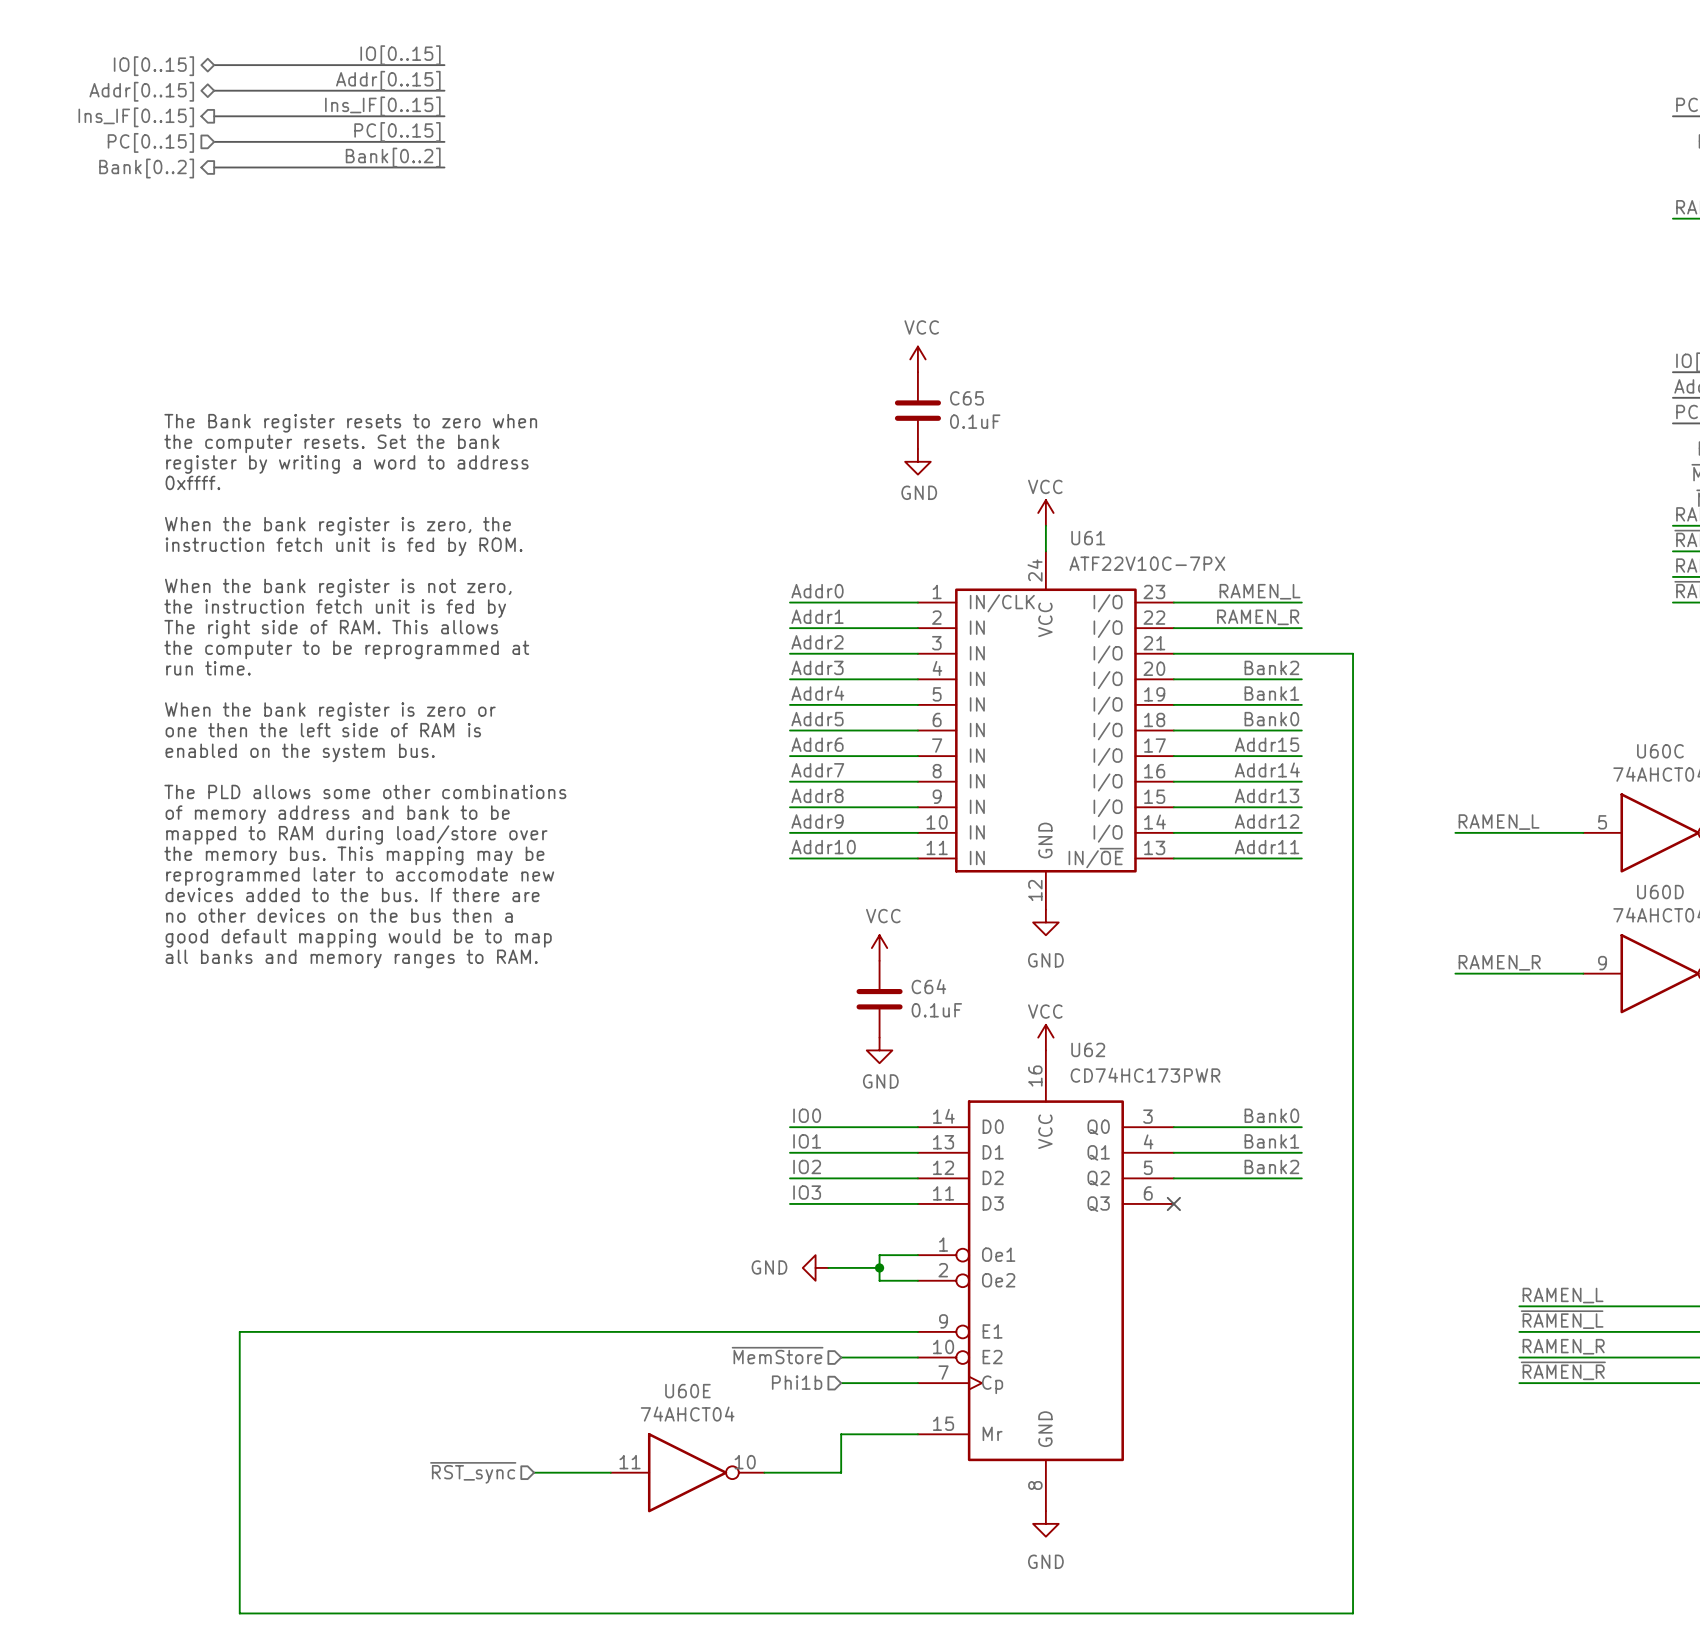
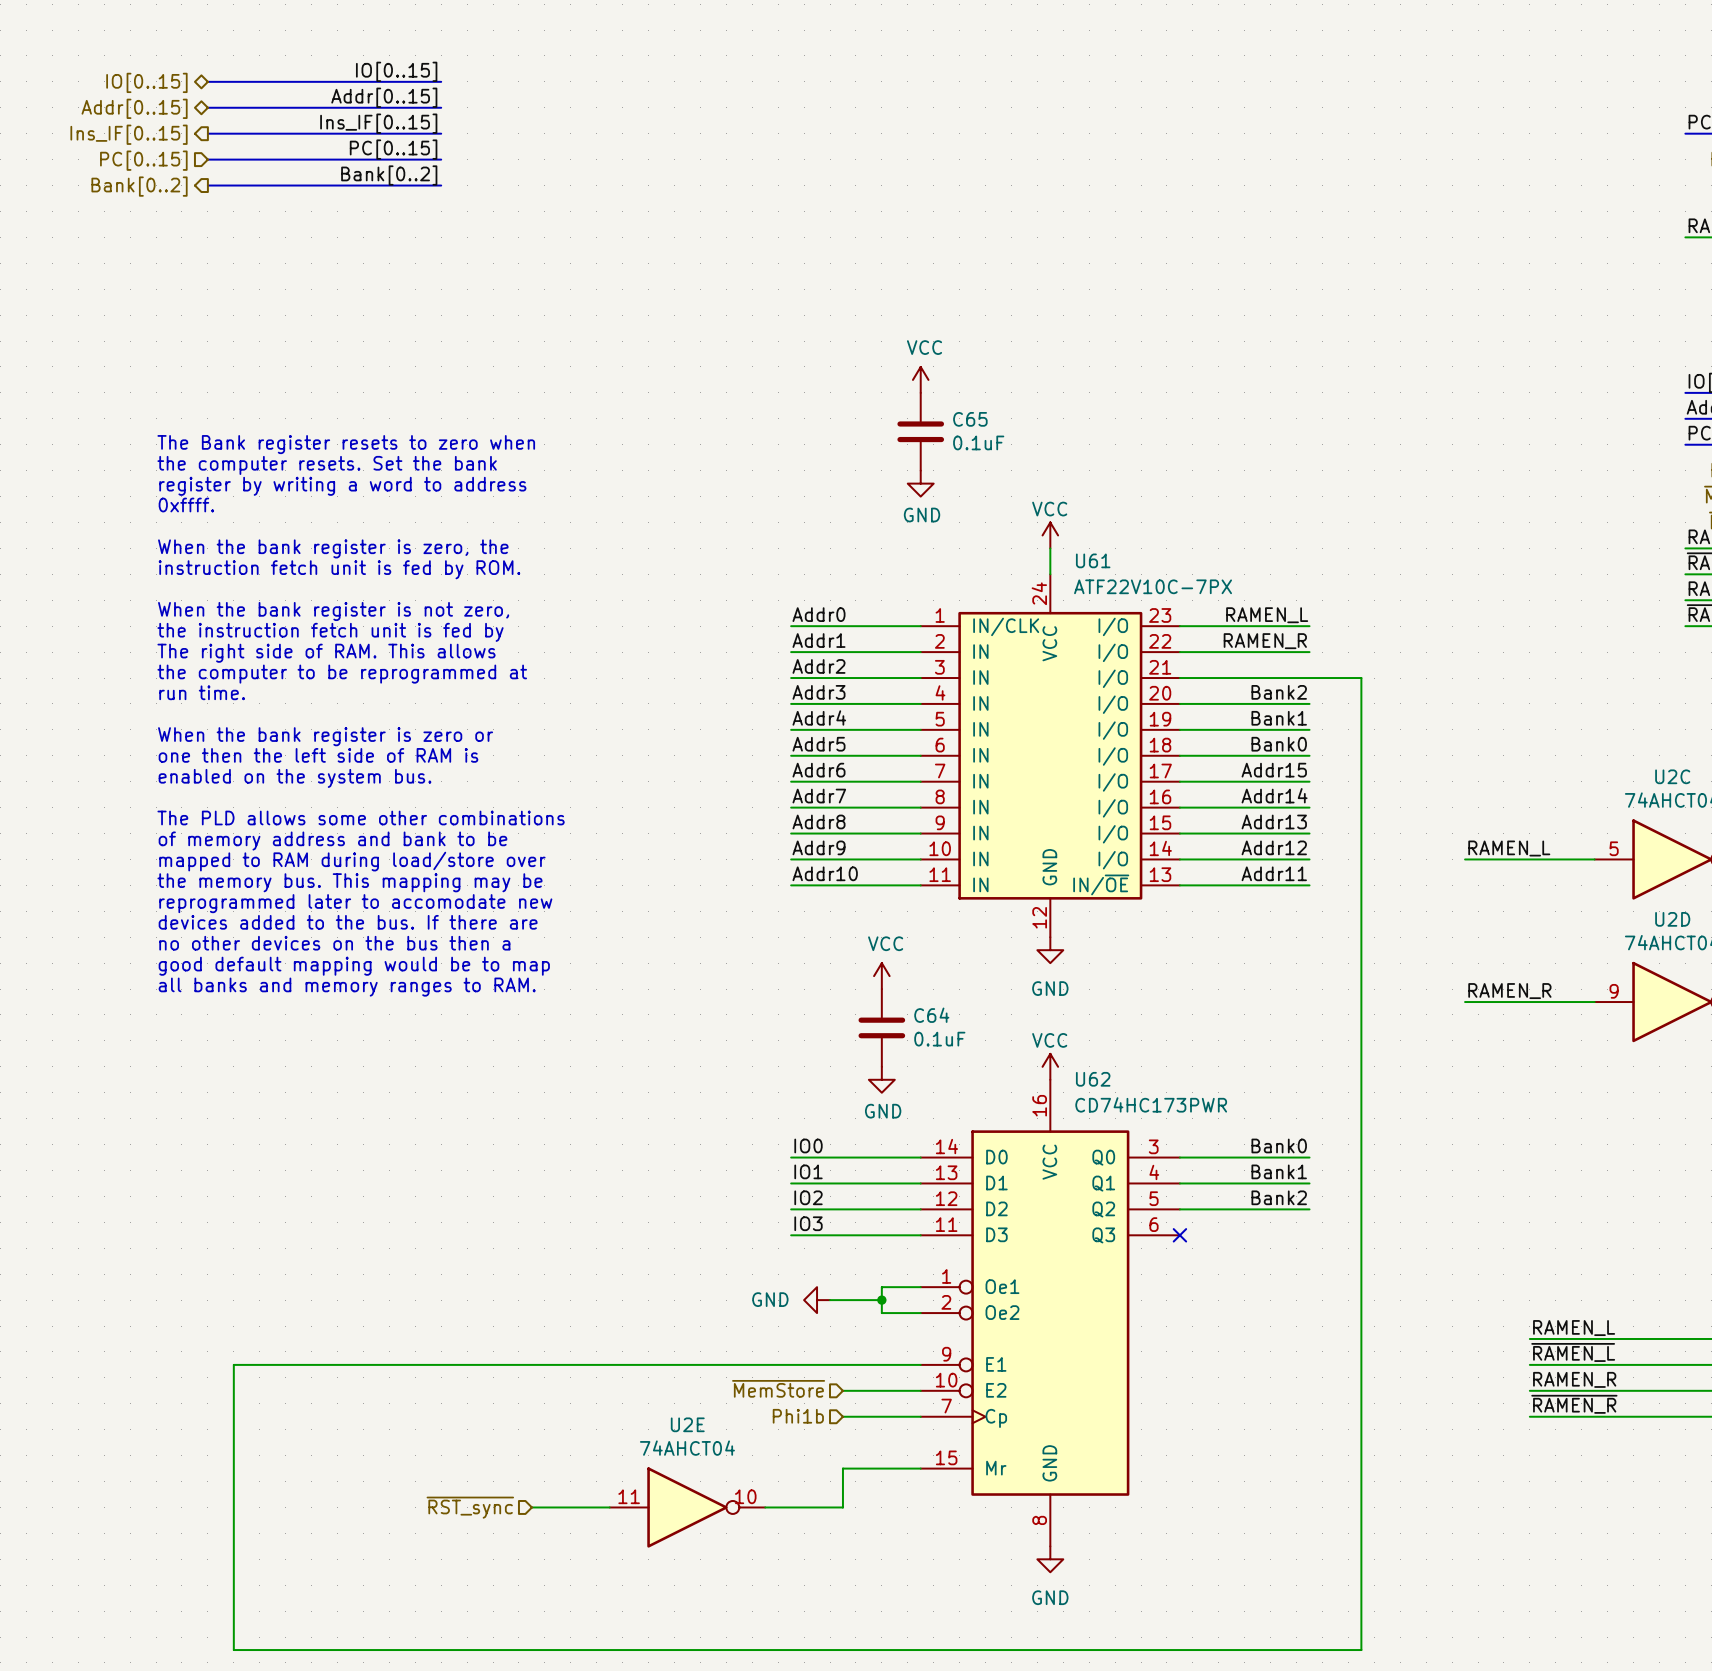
U60C name: U60C (1660, 751) -> U2C (1672, 776)
U60D name: U60D (1660, 892) -> U2D (1672, 919)
U60E name: U60E (687, 1391) -> U2E (687, 1424)

